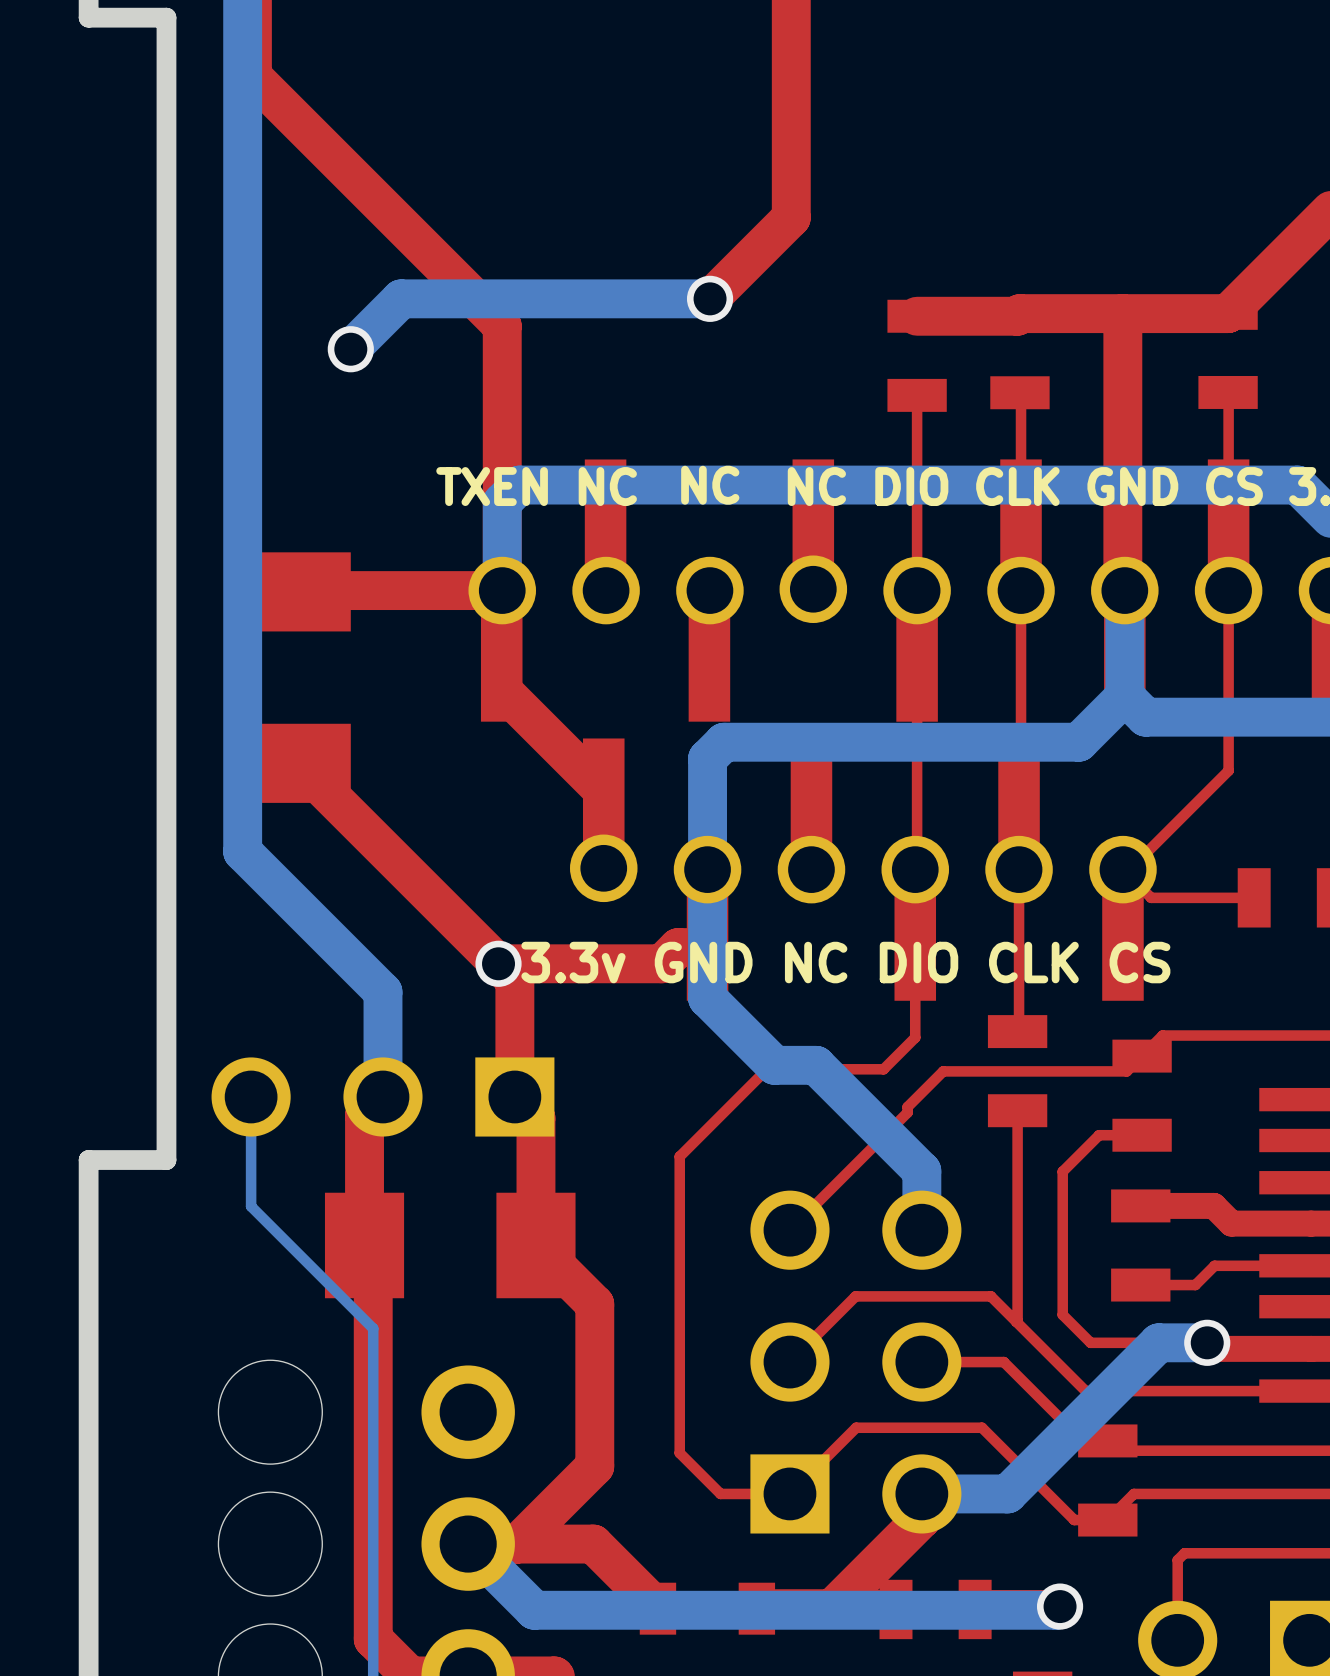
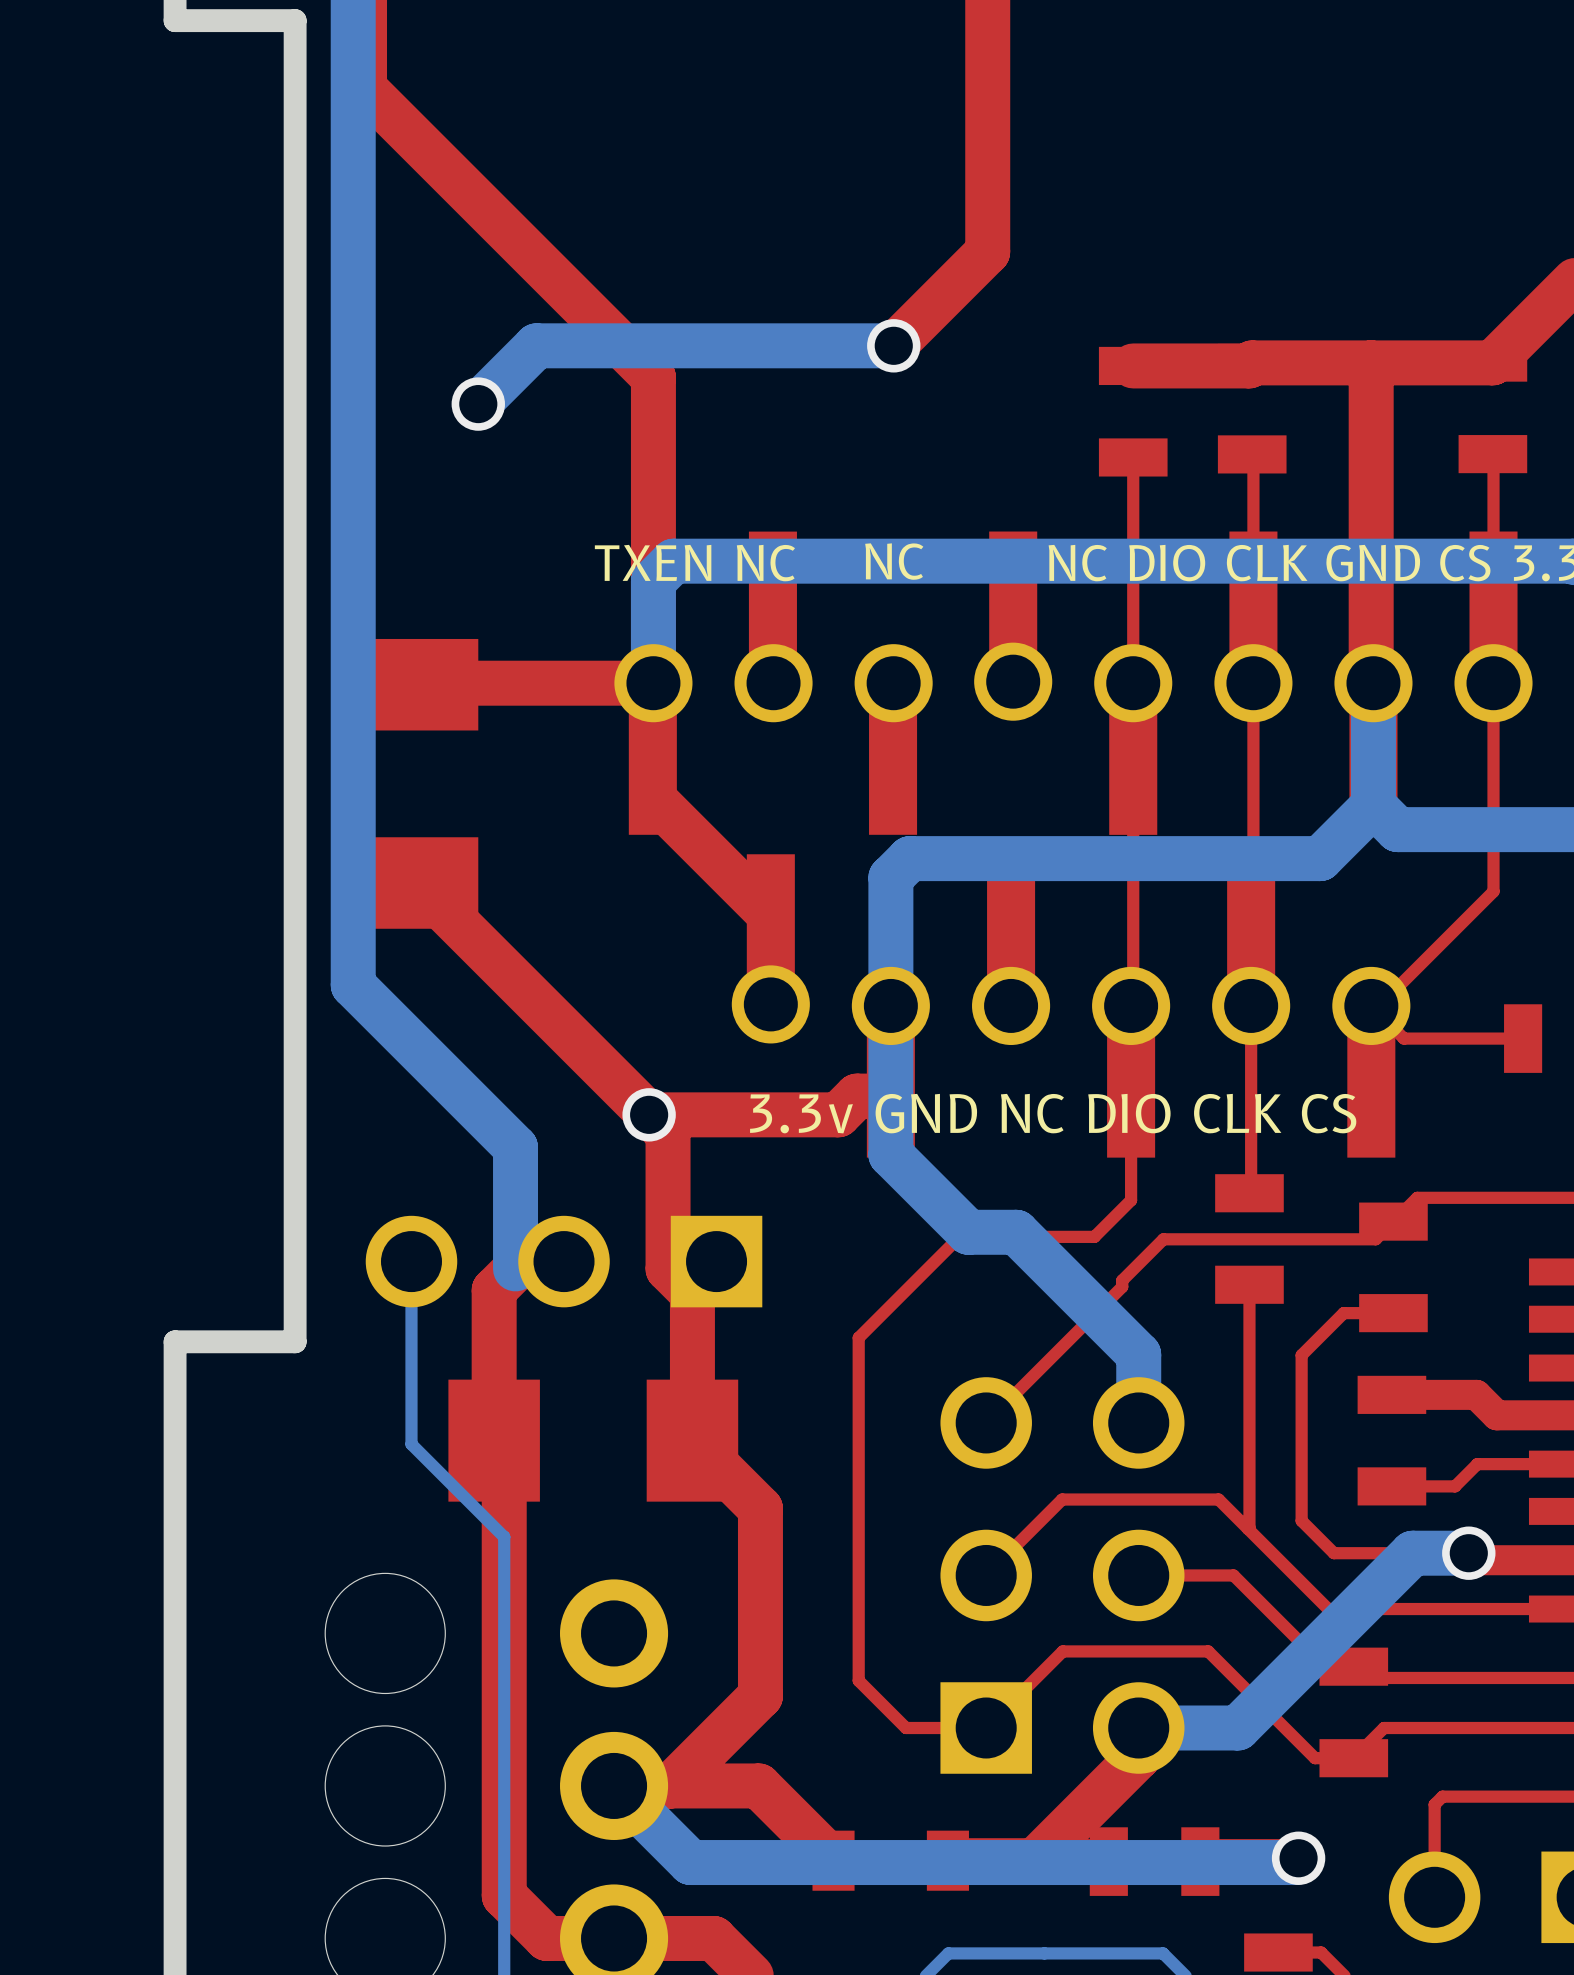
board edge: (166, 17) (166, 1160) -> (265, 20) (295, 20) (295, 1341) (265, 1341)
bottom track: (251, 1096) (251, 1206) (373, 1328) -> (411, 1261) (411, 1444) (504, 1537)
part position: (382, 1096) -> (564, 1261)

